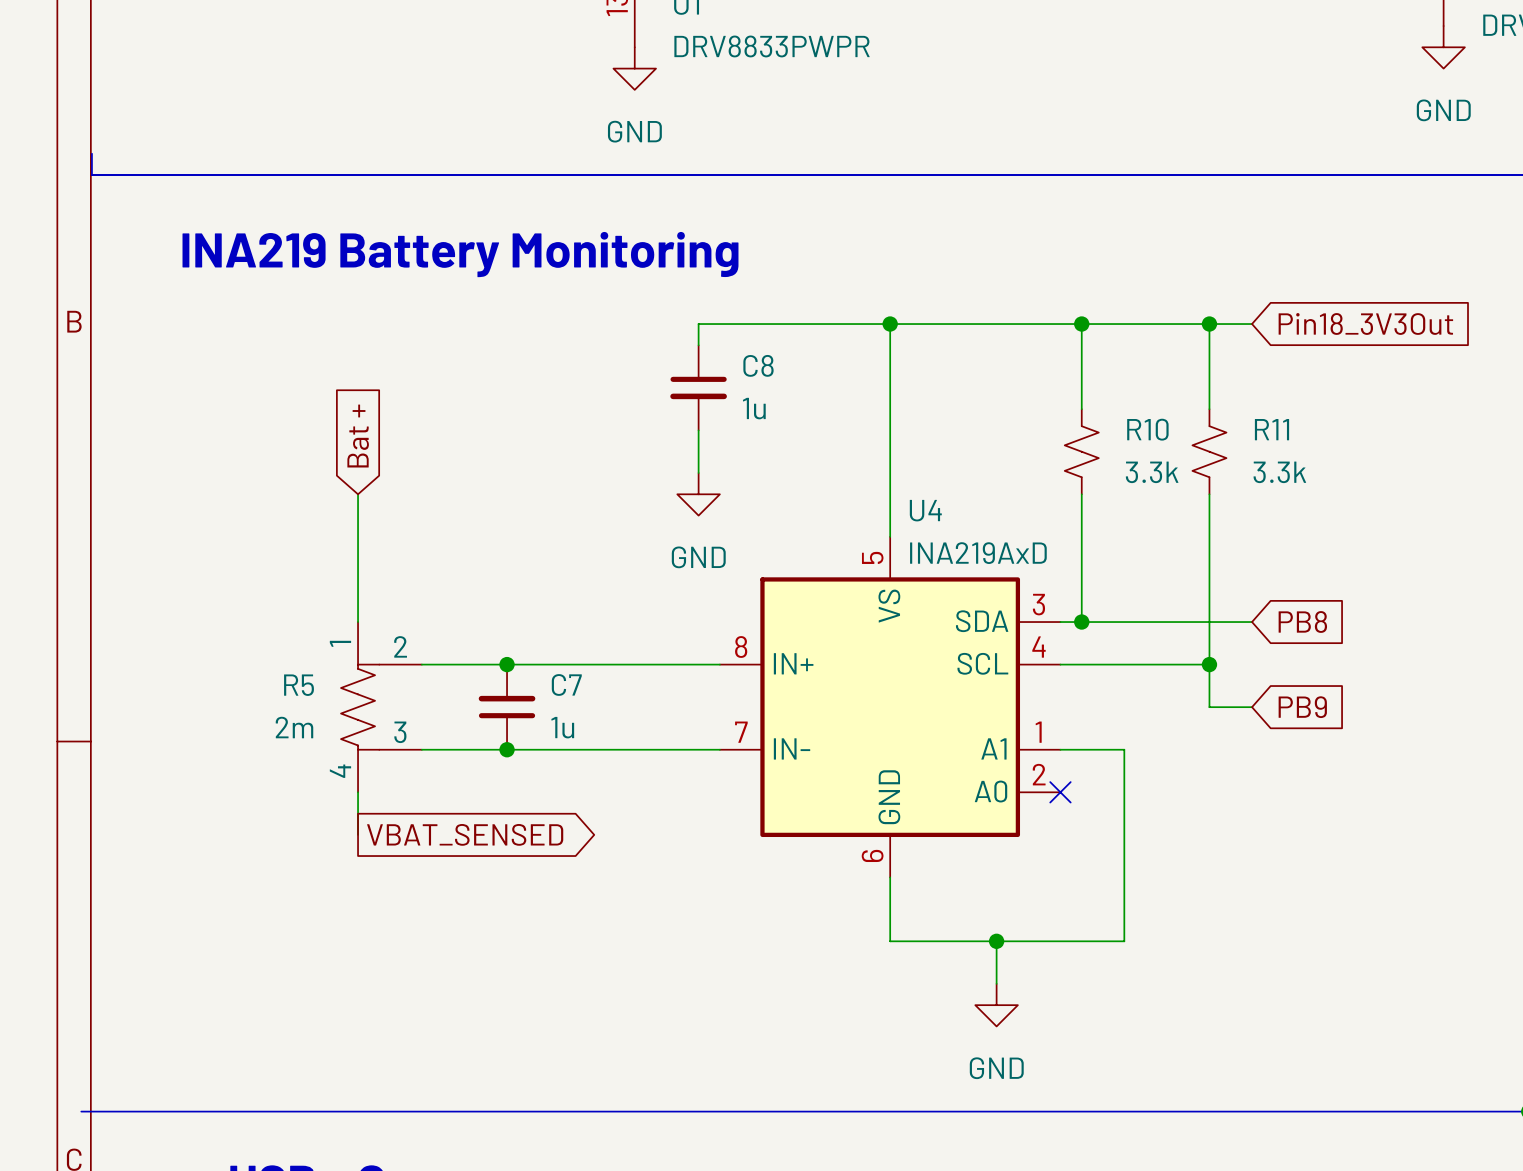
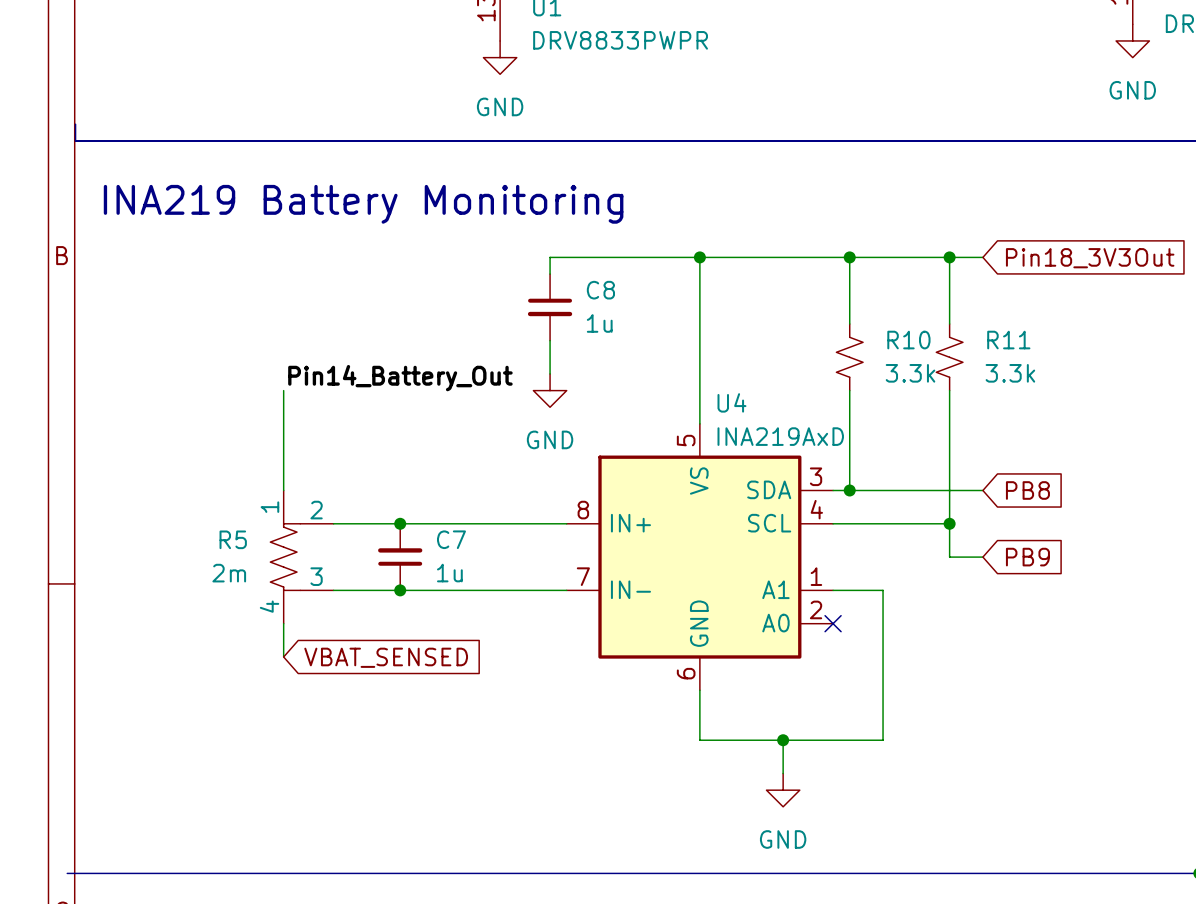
global label: Bat + (358, 436) -> none
label: none -> Pin14_Battery_Out (400, 378)
global label shape: output (465, 834) -> input (386, 657)

